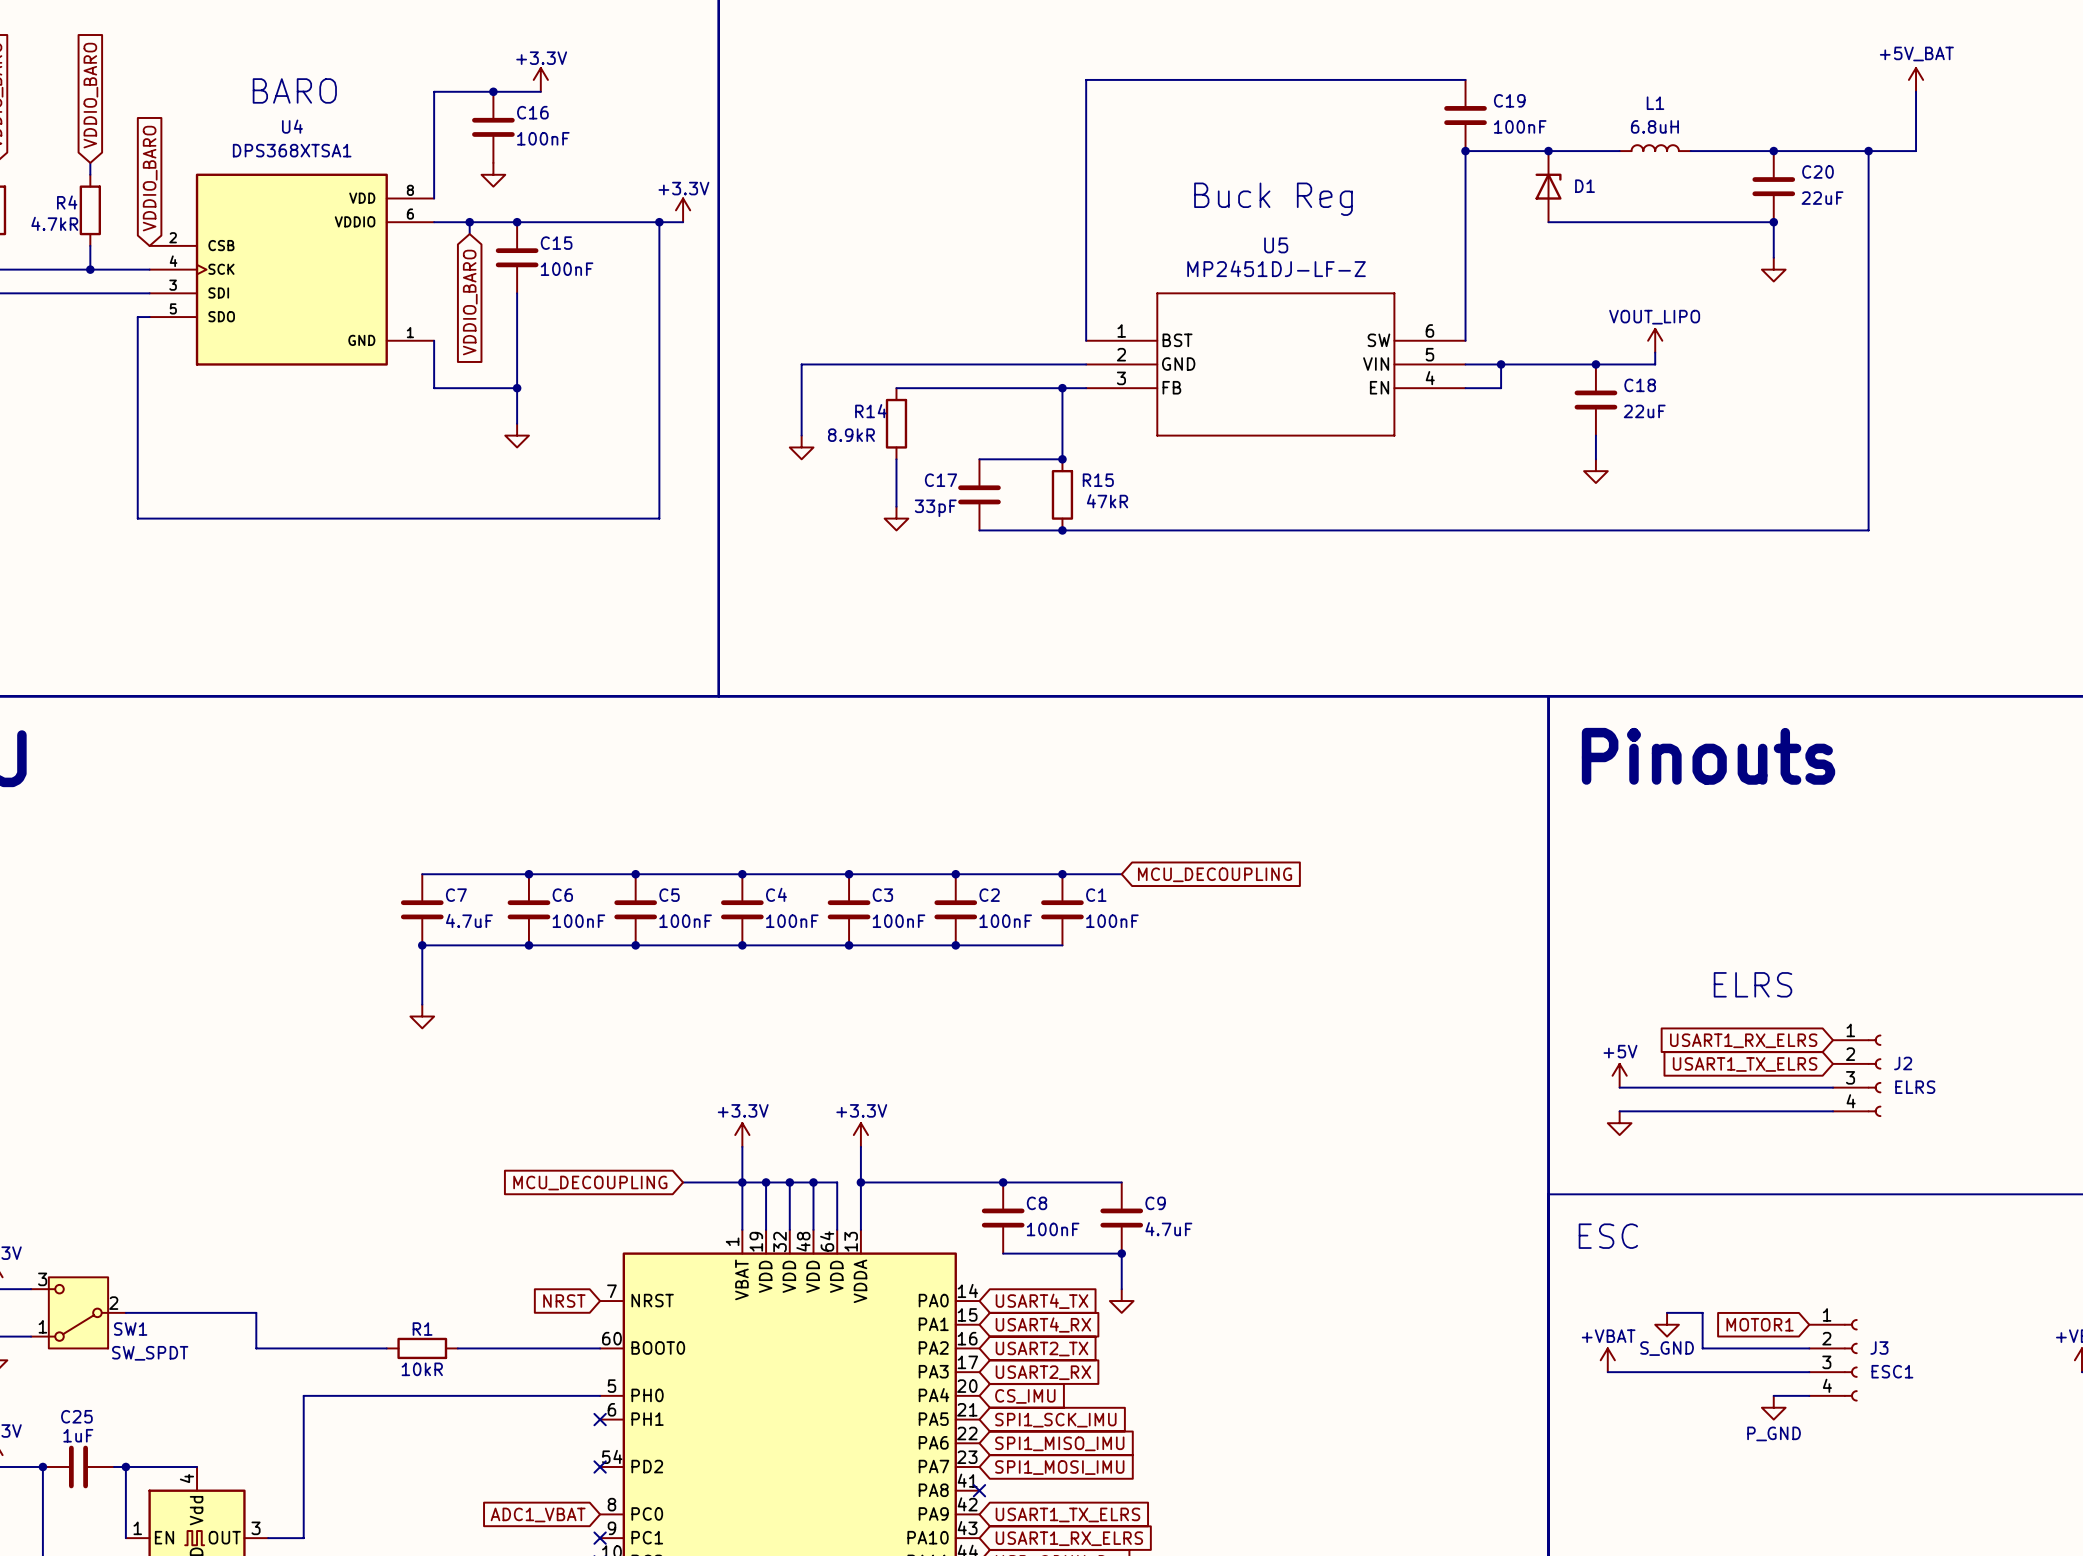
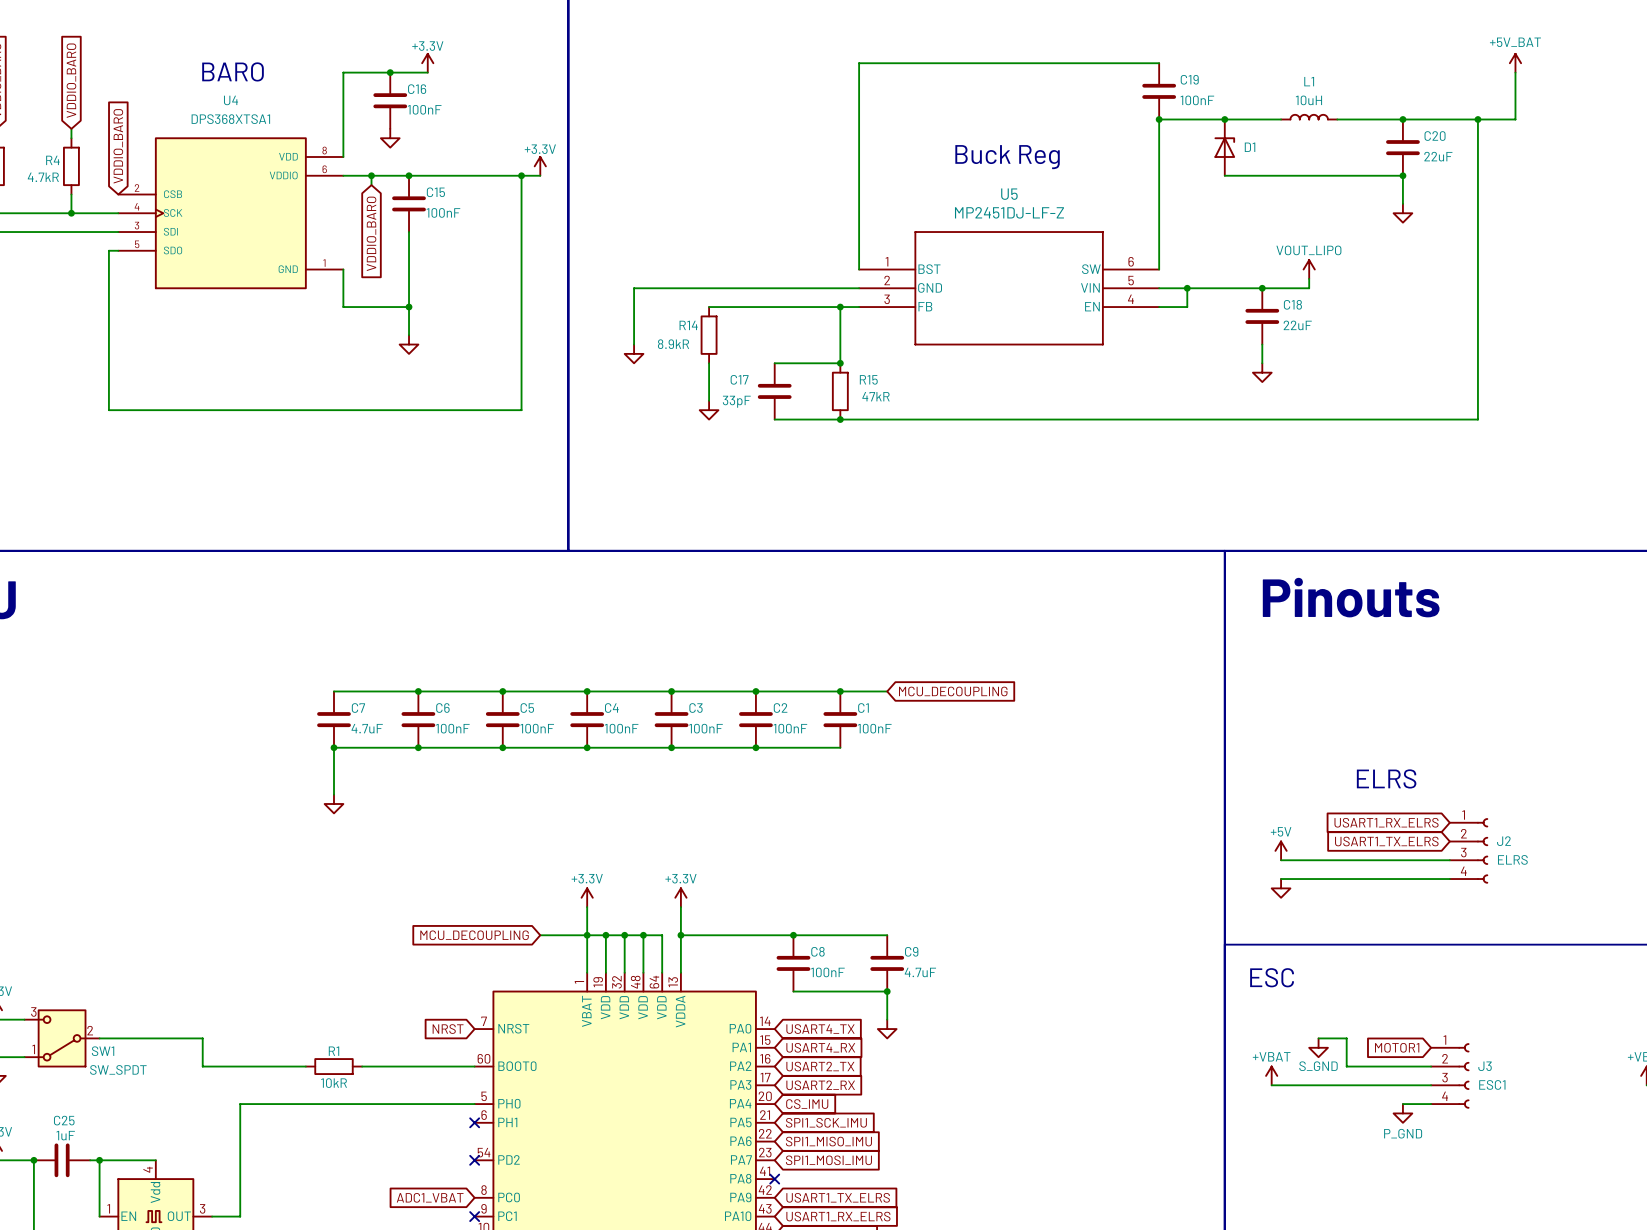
L1 value: 6.8uH (1654, 126) -> 10uH (1308, 100)

